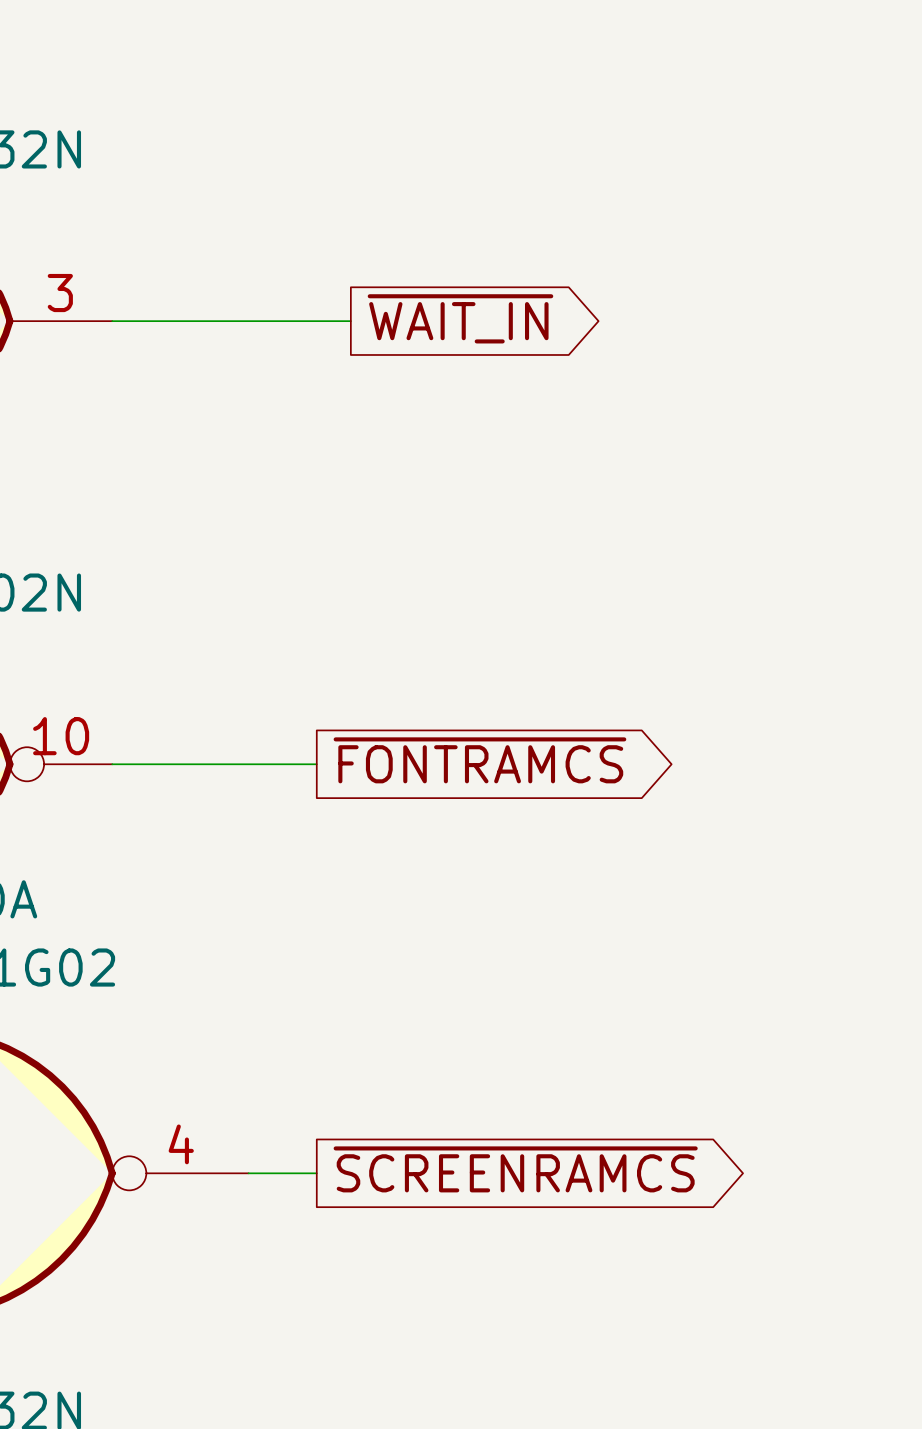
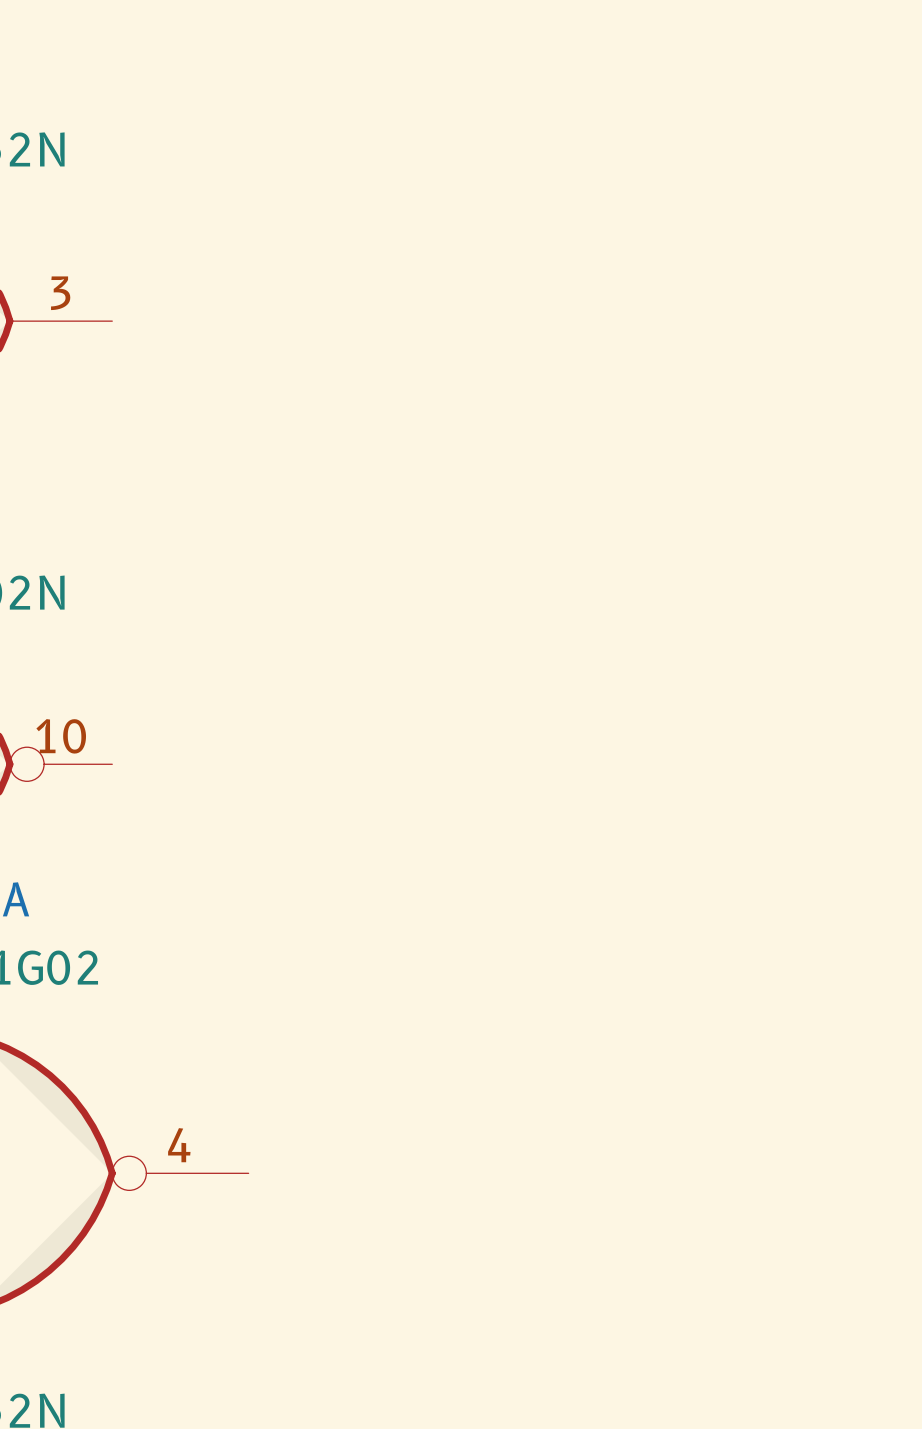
global label: ~{WAIT_IN} (460, 318) -> none
wire: (112, 321) (350, 321) -> none
global label: ~{FONTRAMCS} (479, 760) -> none
wire: (112, 764) (316, 764) -> none
global label: ~{SCREENRAMCS} (515, 1169) -> none
wire: (248, 1173) (316, 1173) -> none

